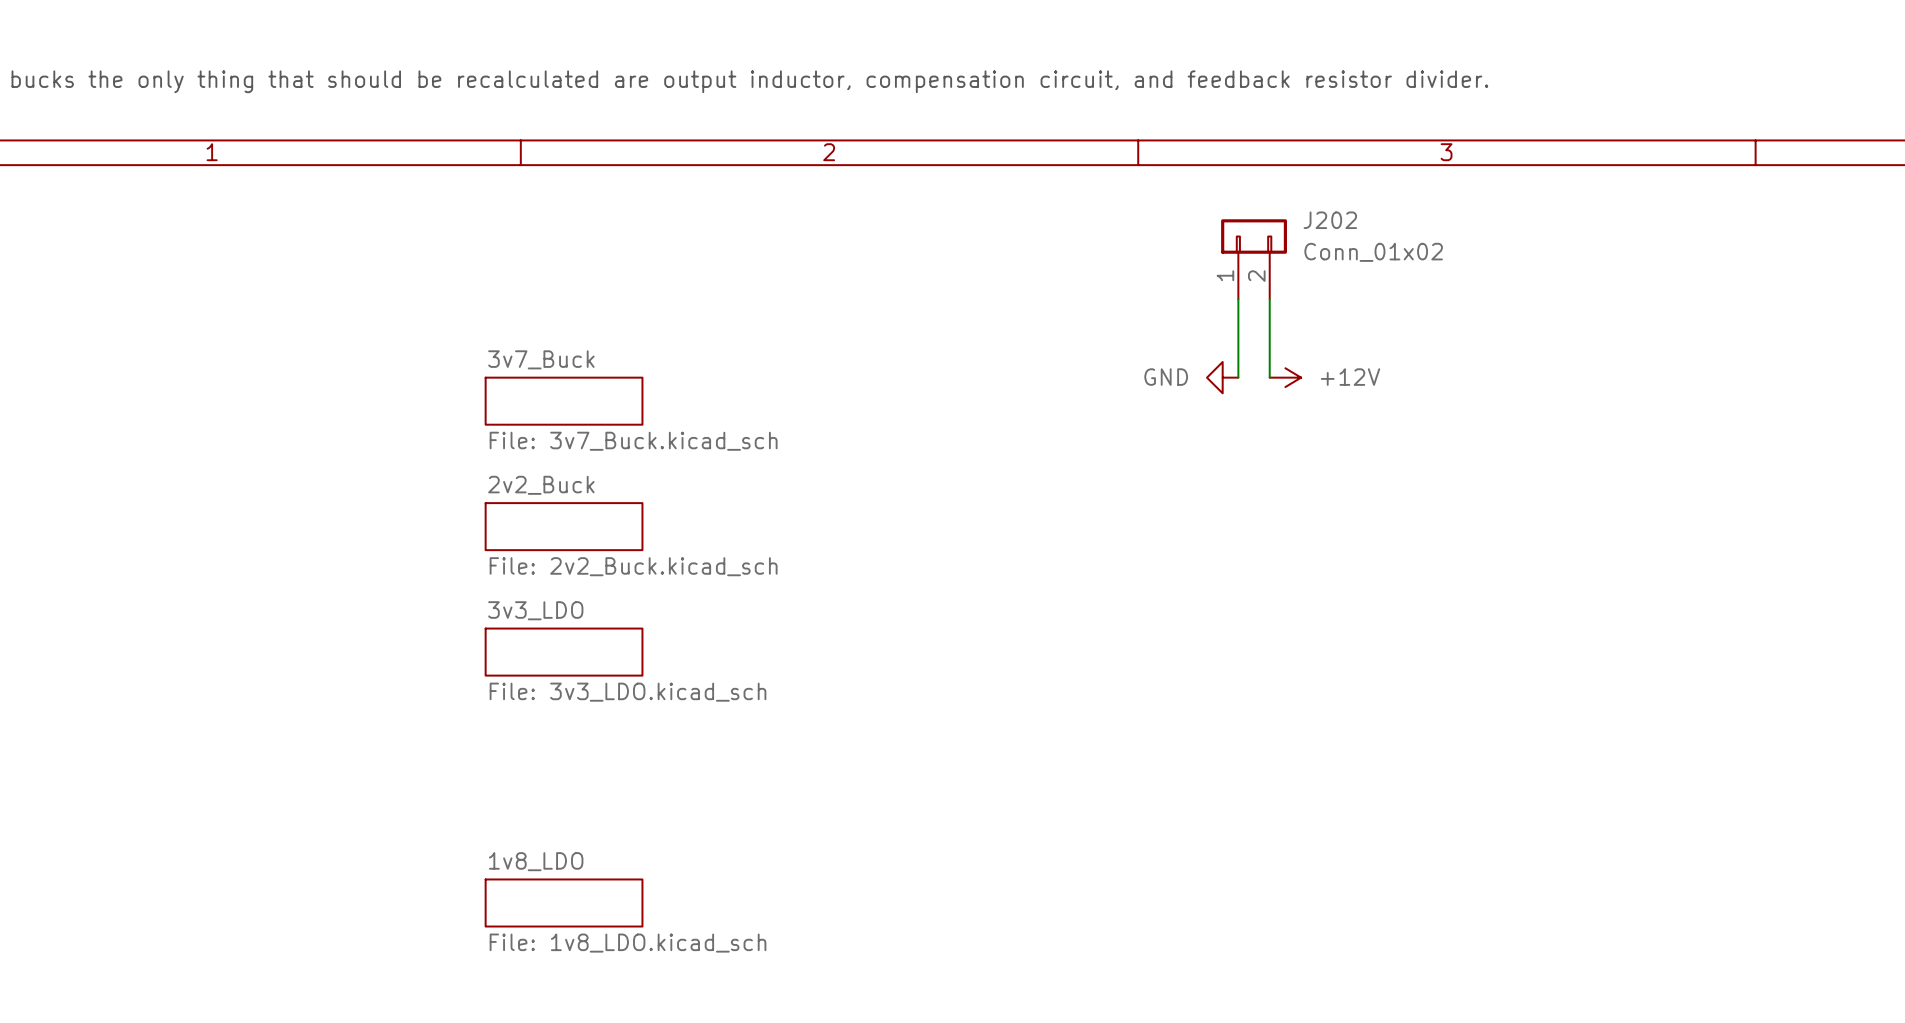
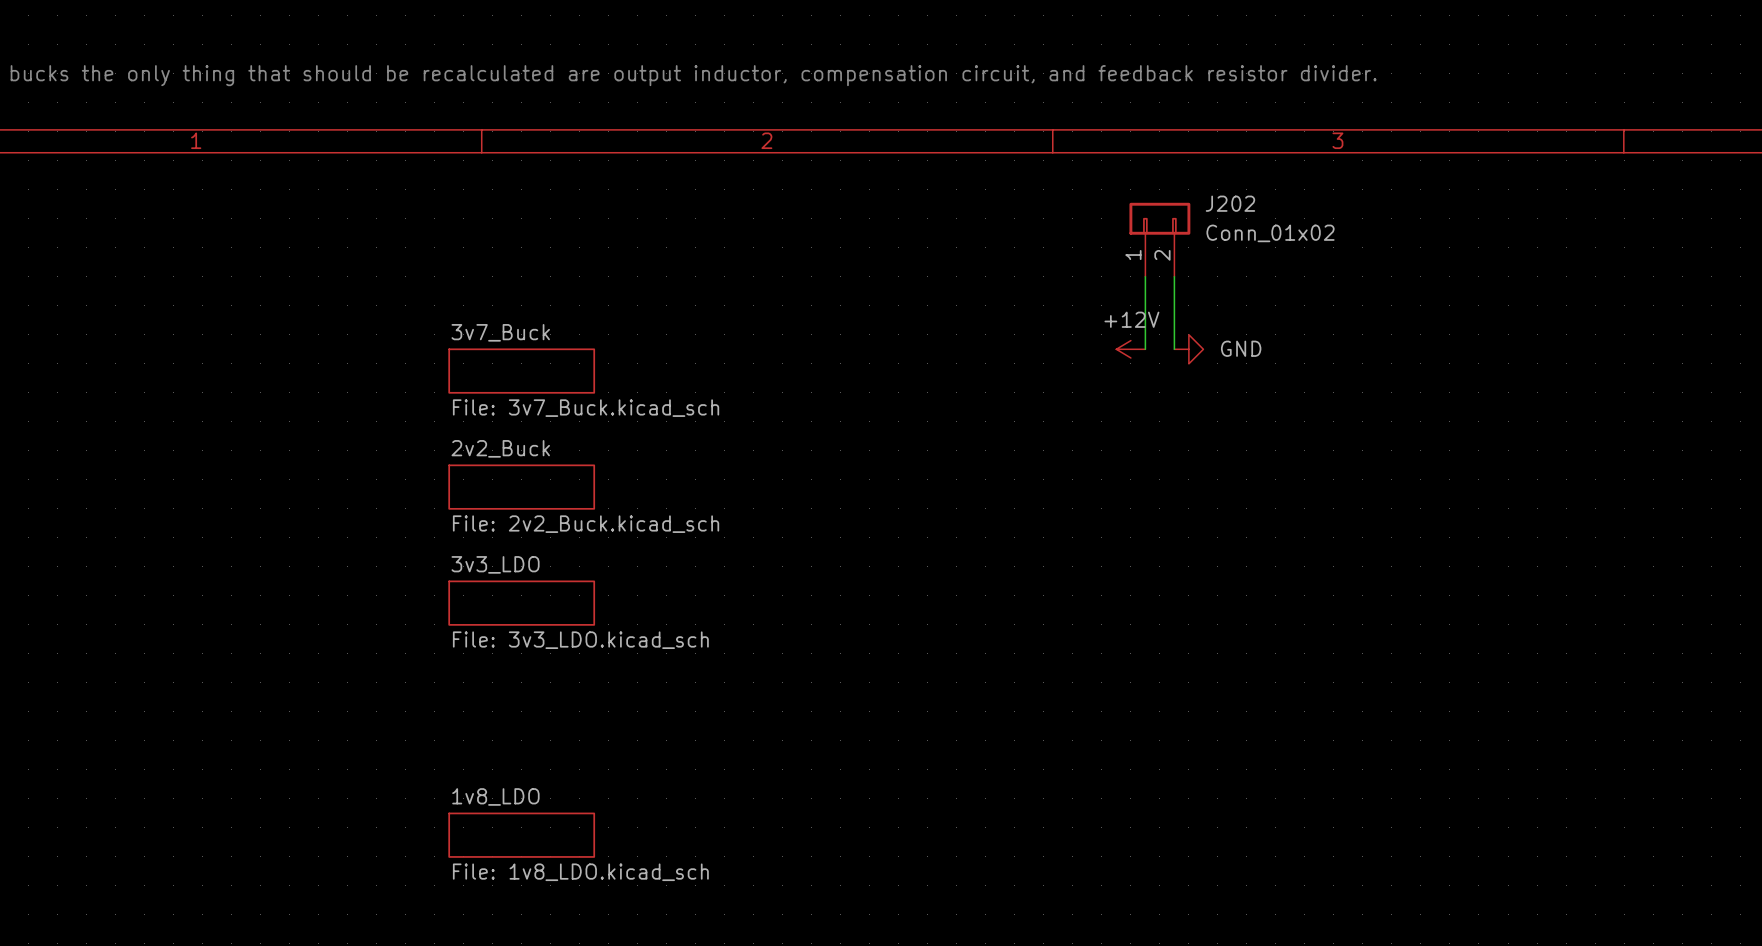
power symbol: GND (1222, 377) -> +12V (1130, 349)
power symbol: +12V (1285, 377) -> GND (1188, 349)

